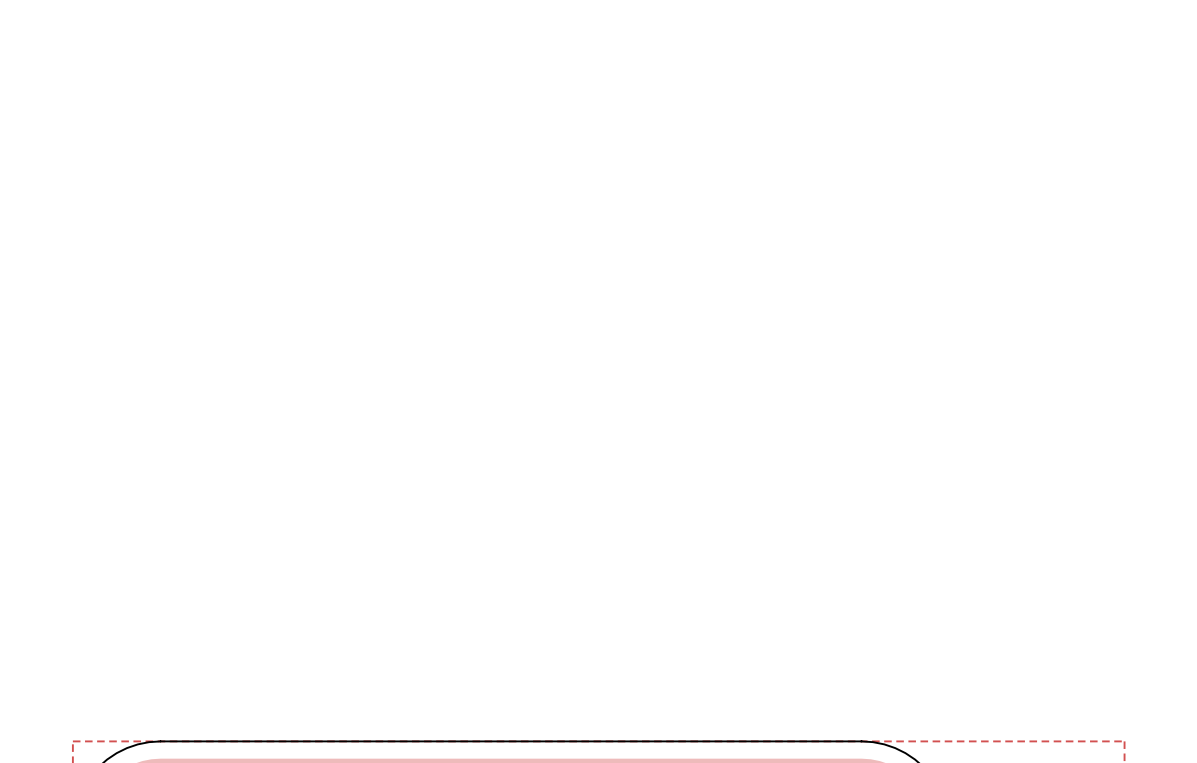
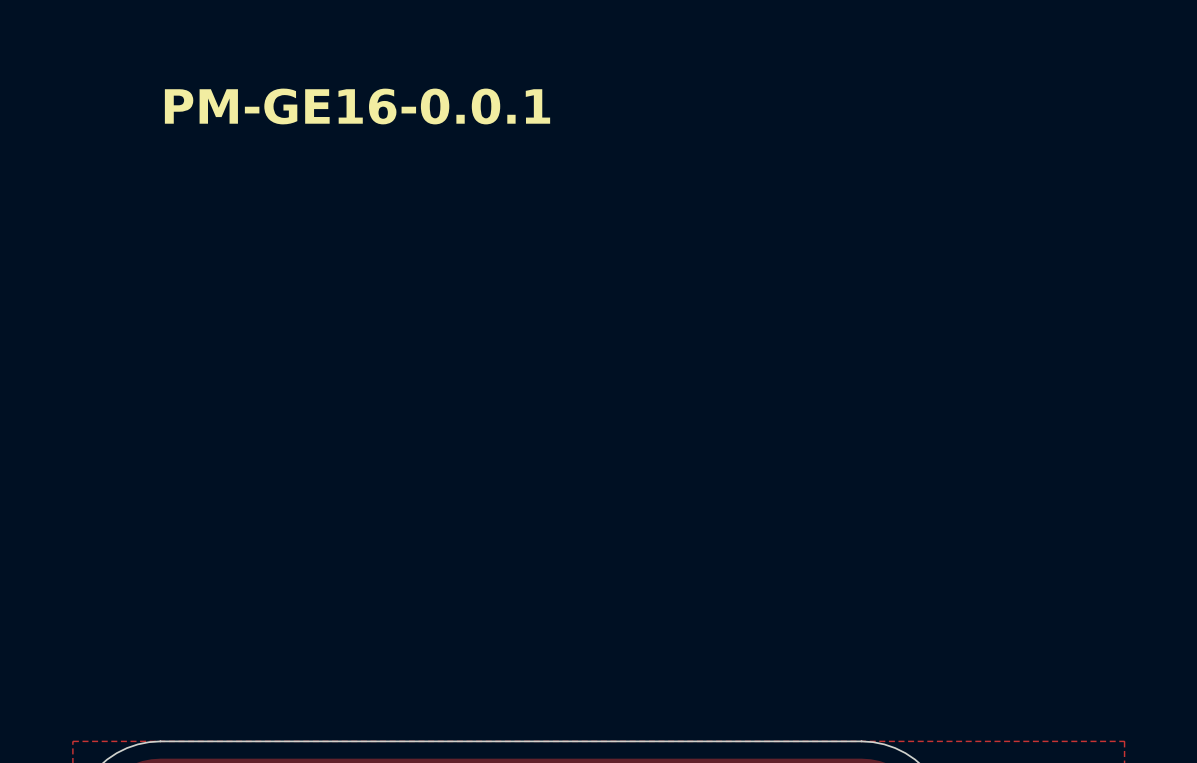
text: none -> PM-GE16-0.0.1 (357, 106)

